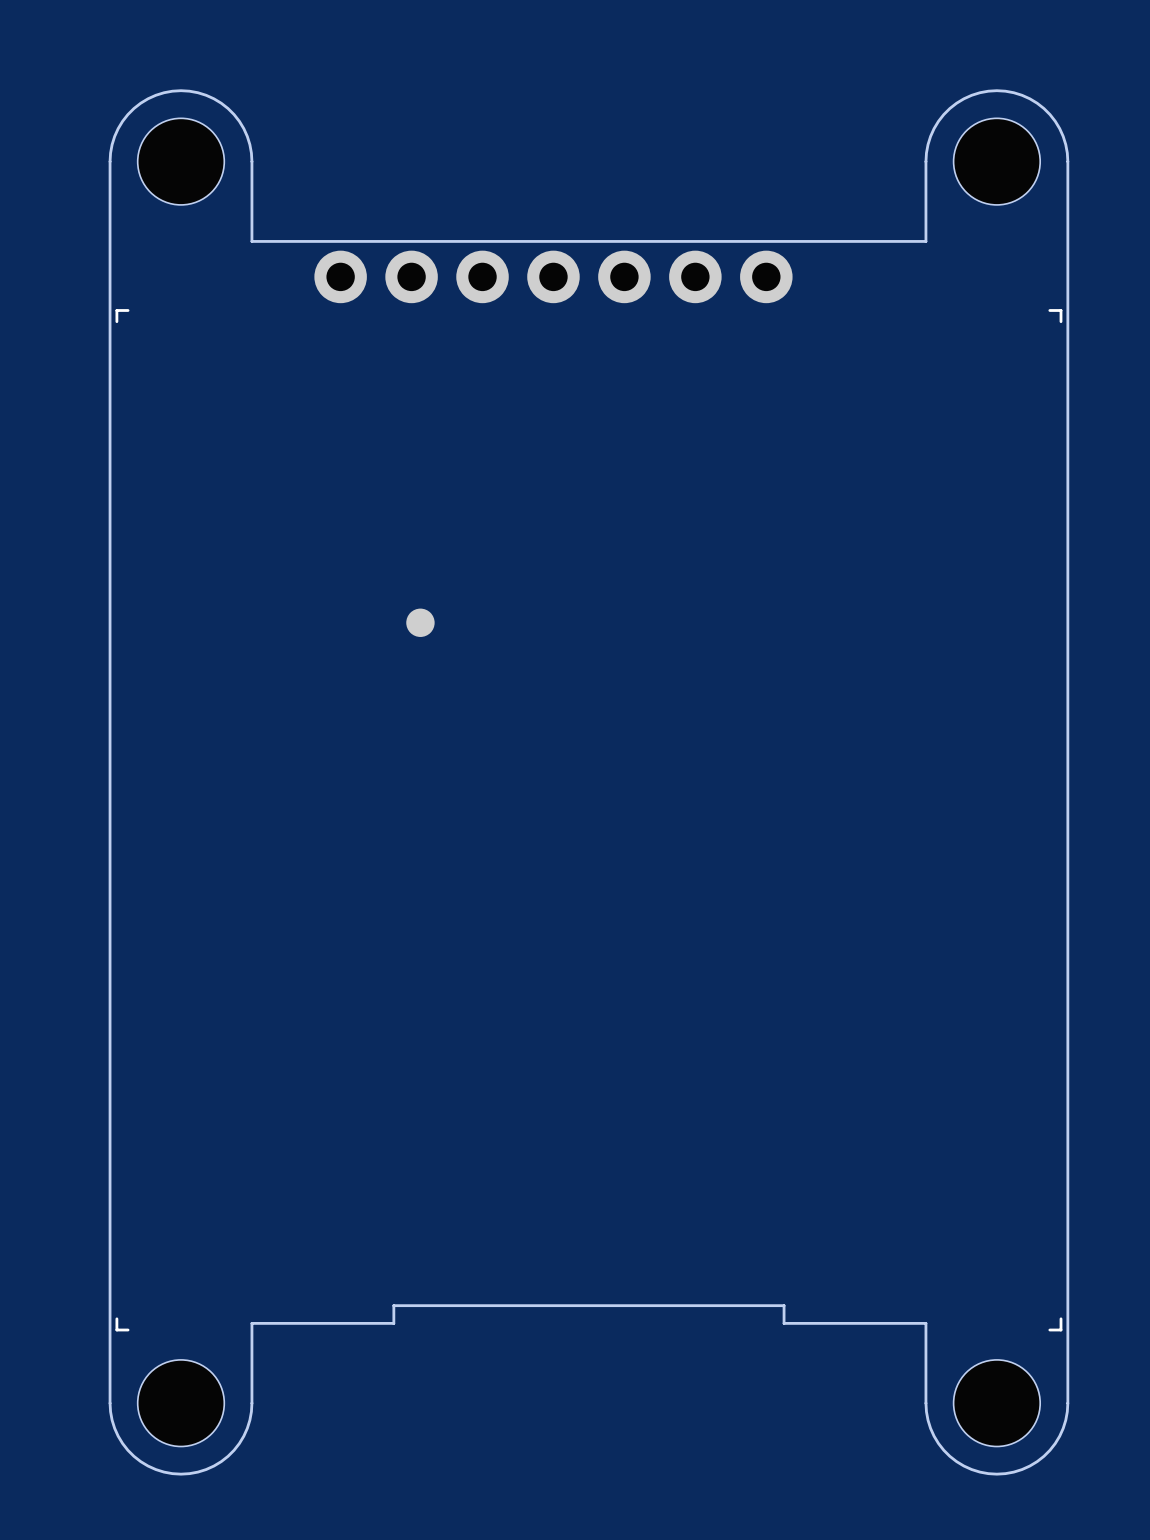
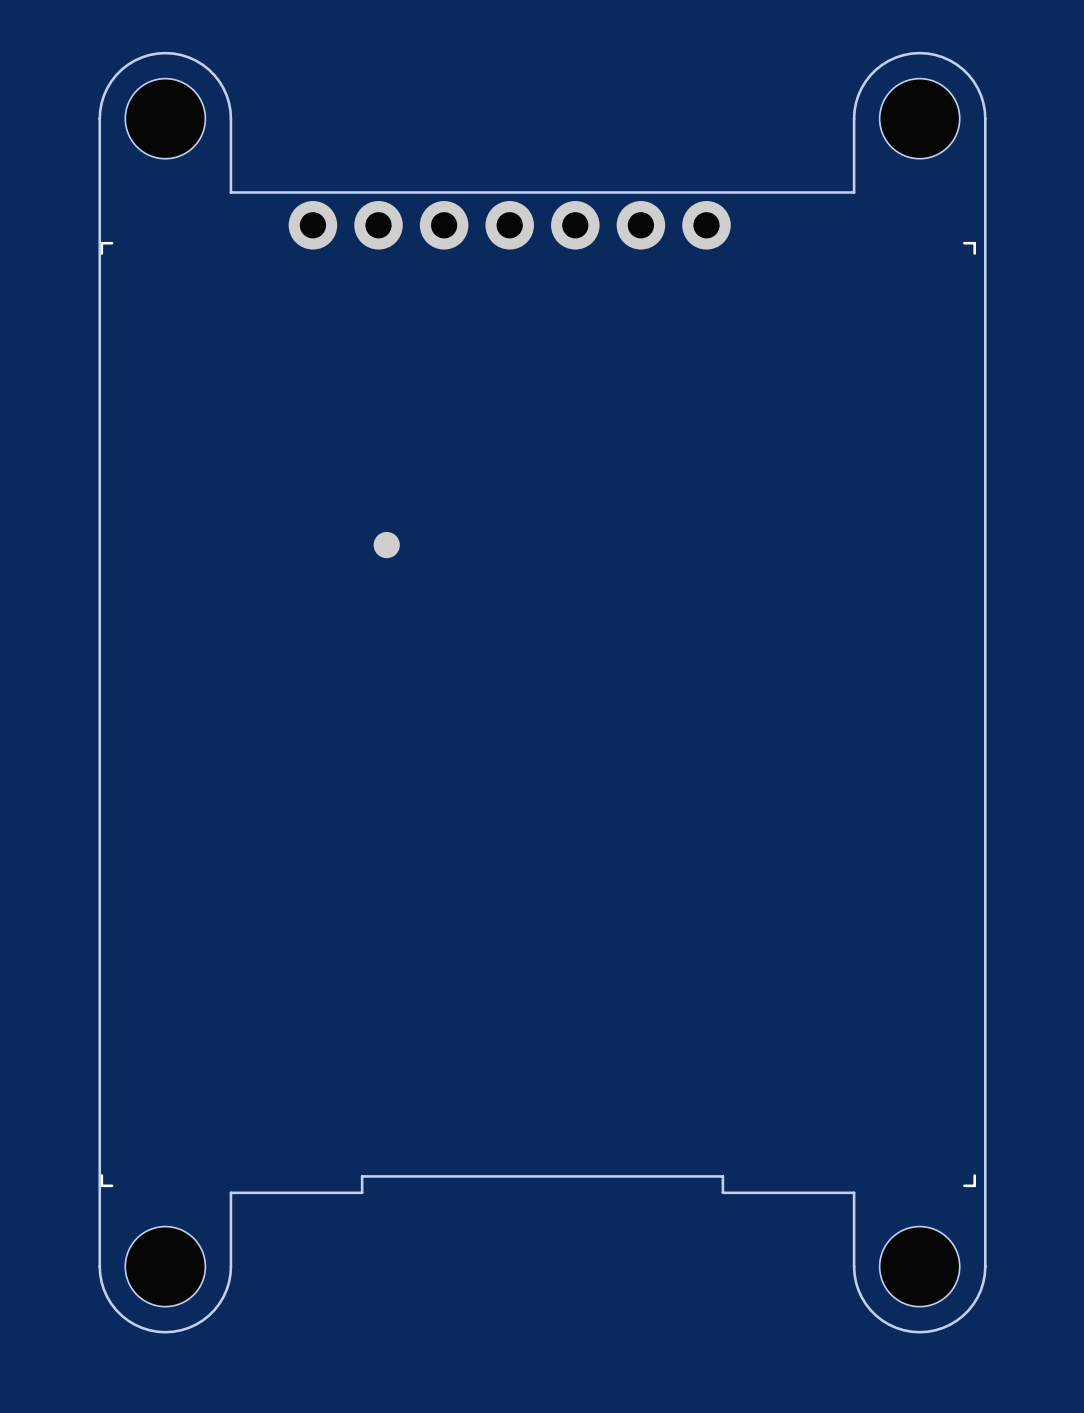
drawing position: (588, 820) -> (538, 714)

